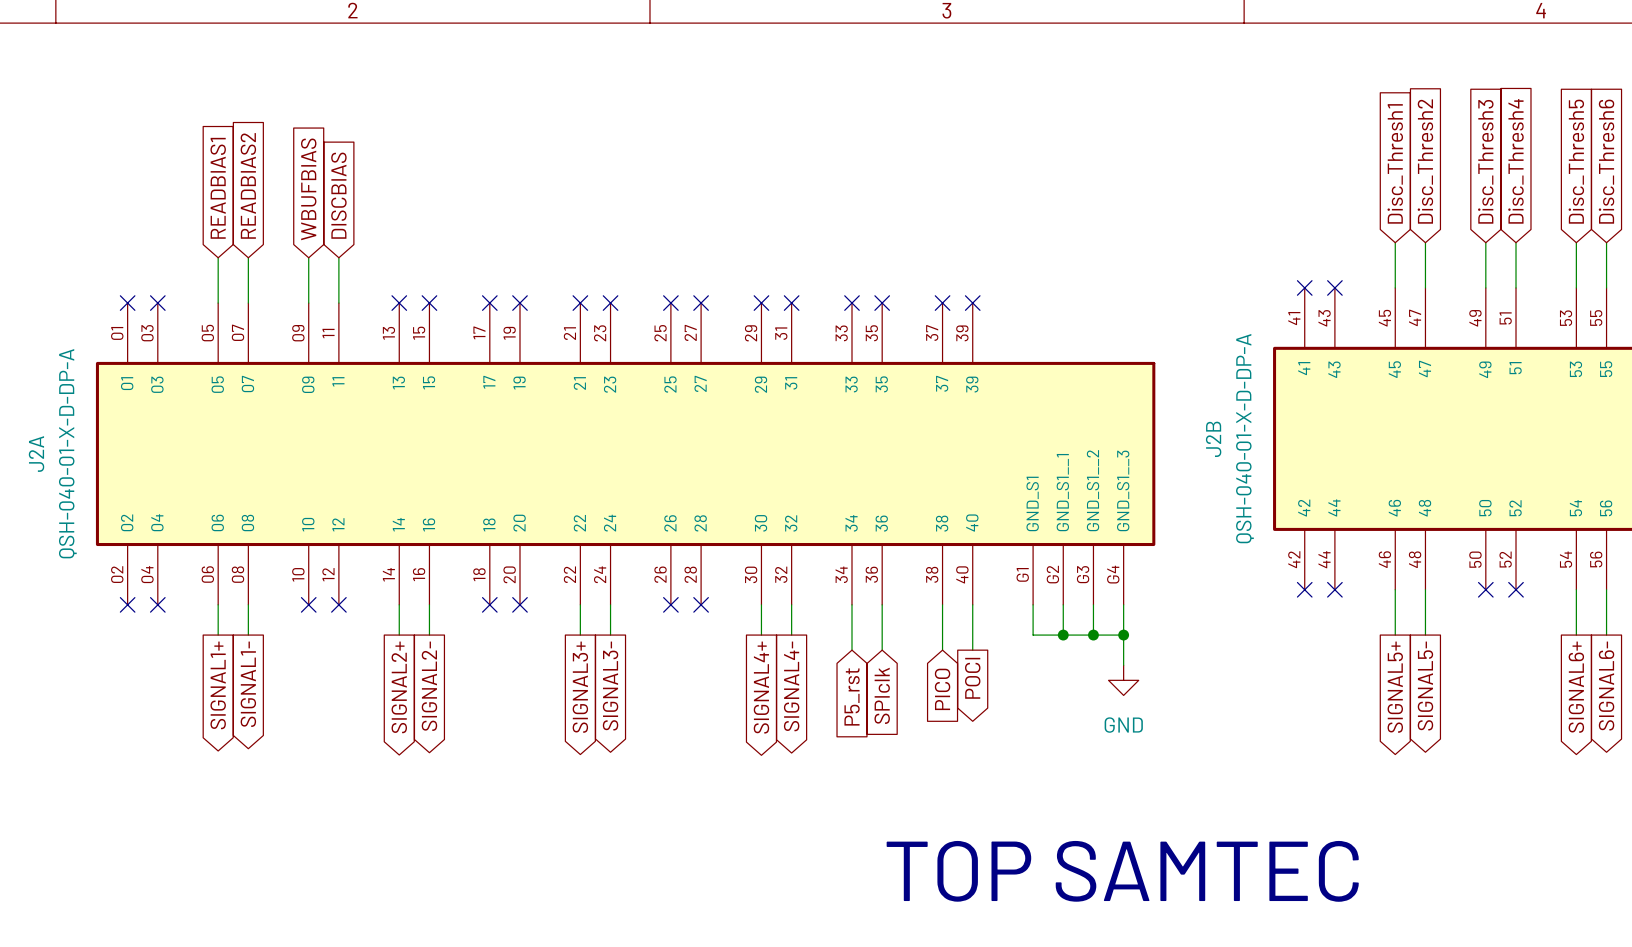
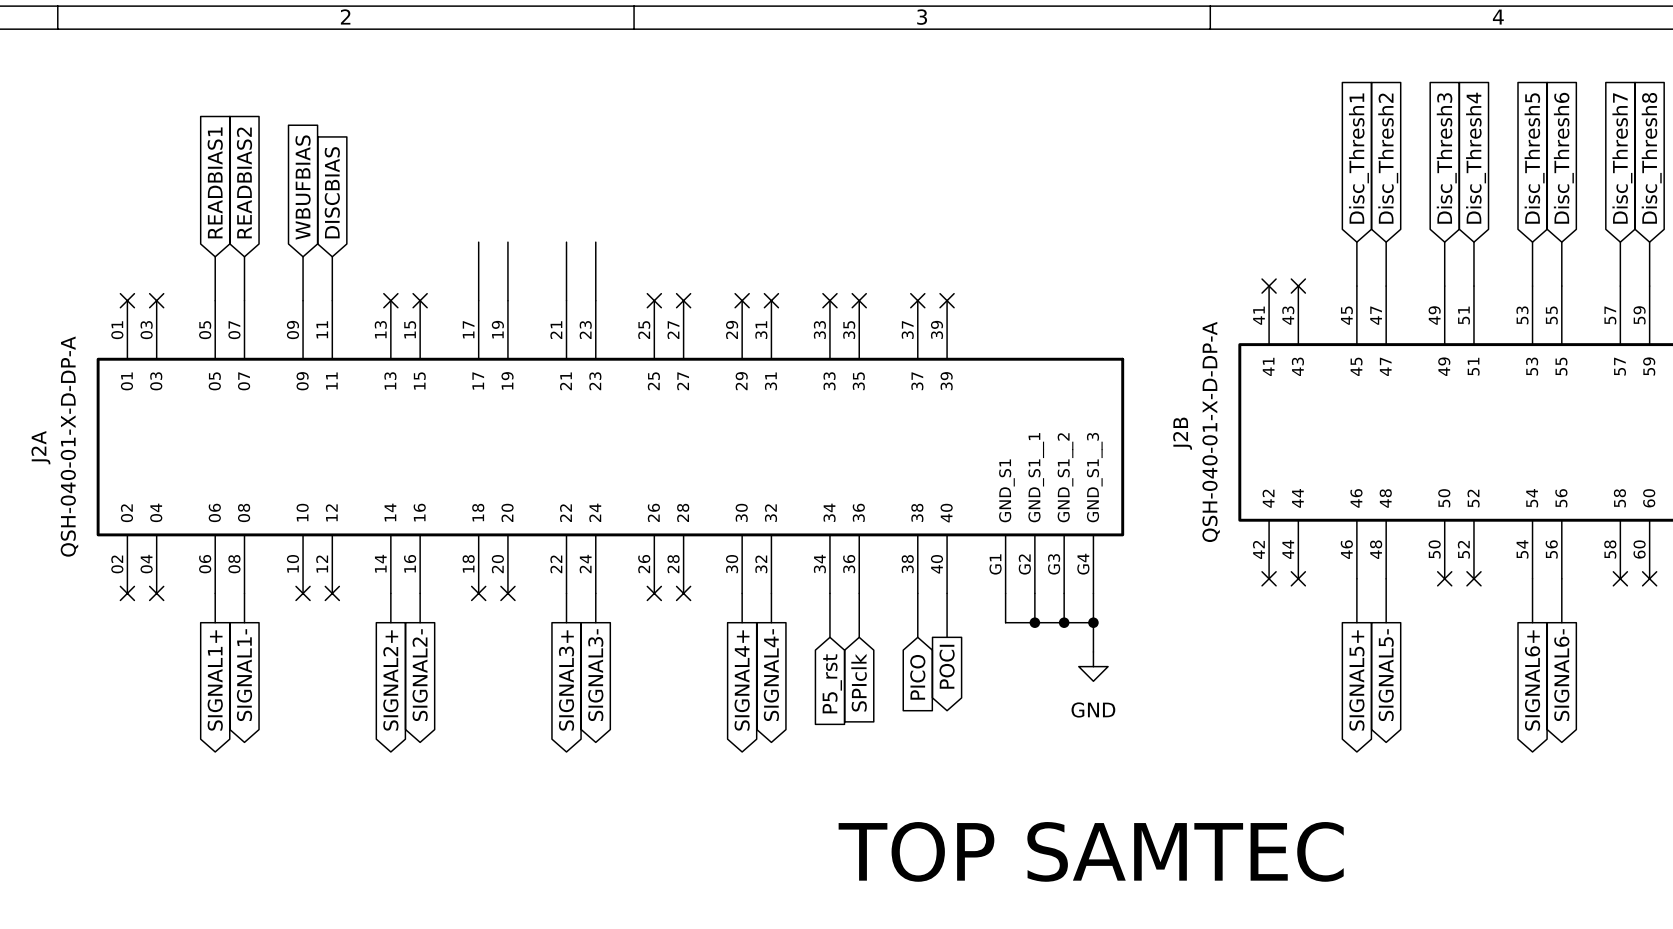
wire: none -> (478, 242) (478, 300)
wire: none -> (507, 242) (507, 300)
wire: none -> (566, 242) (566, 300)
wire: none -> (595, 242) (595, 300)
no-connect mark: (489, 303) -> none
no-connect mark: (519, 303) -> none
no-connect mark: (580, 303) -> none
no-connect mark: (610, 303) -> none

